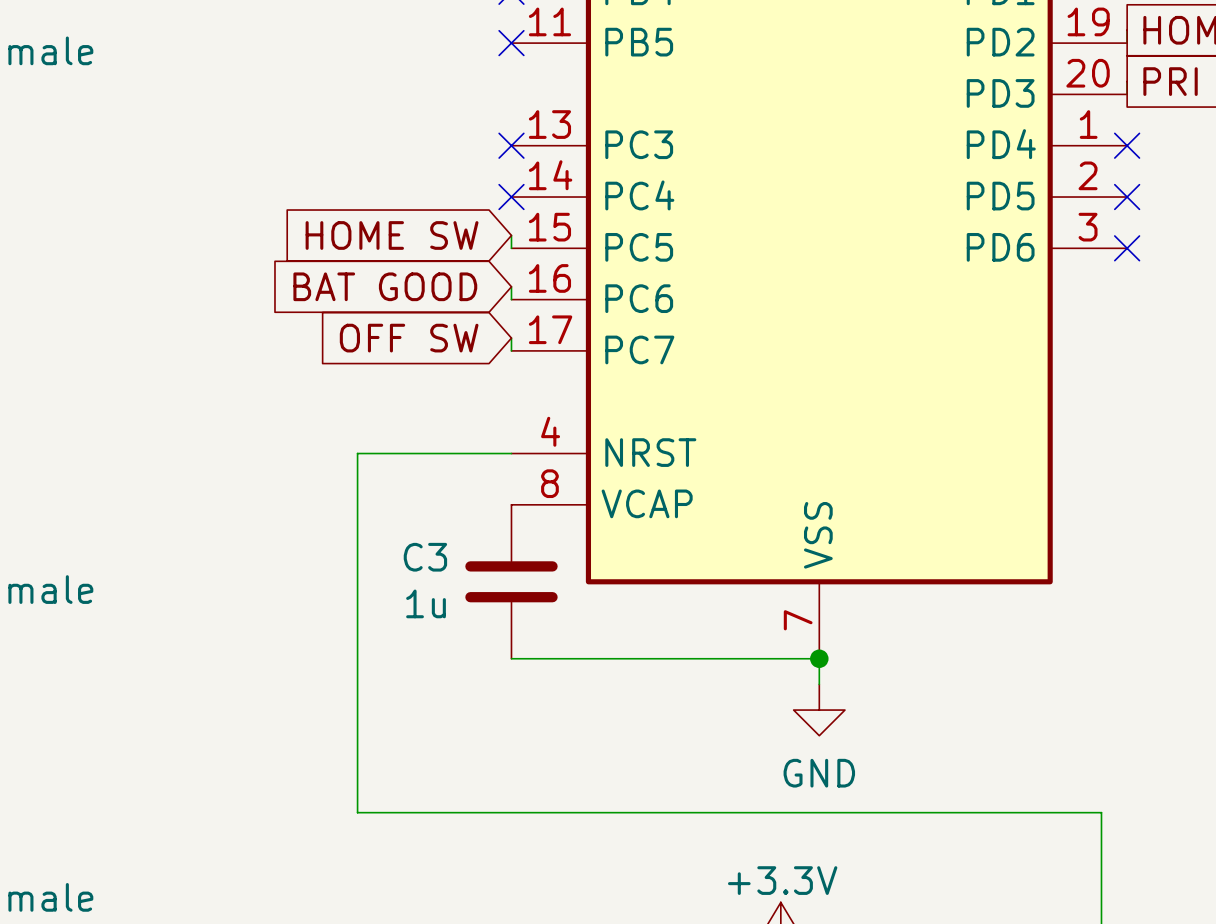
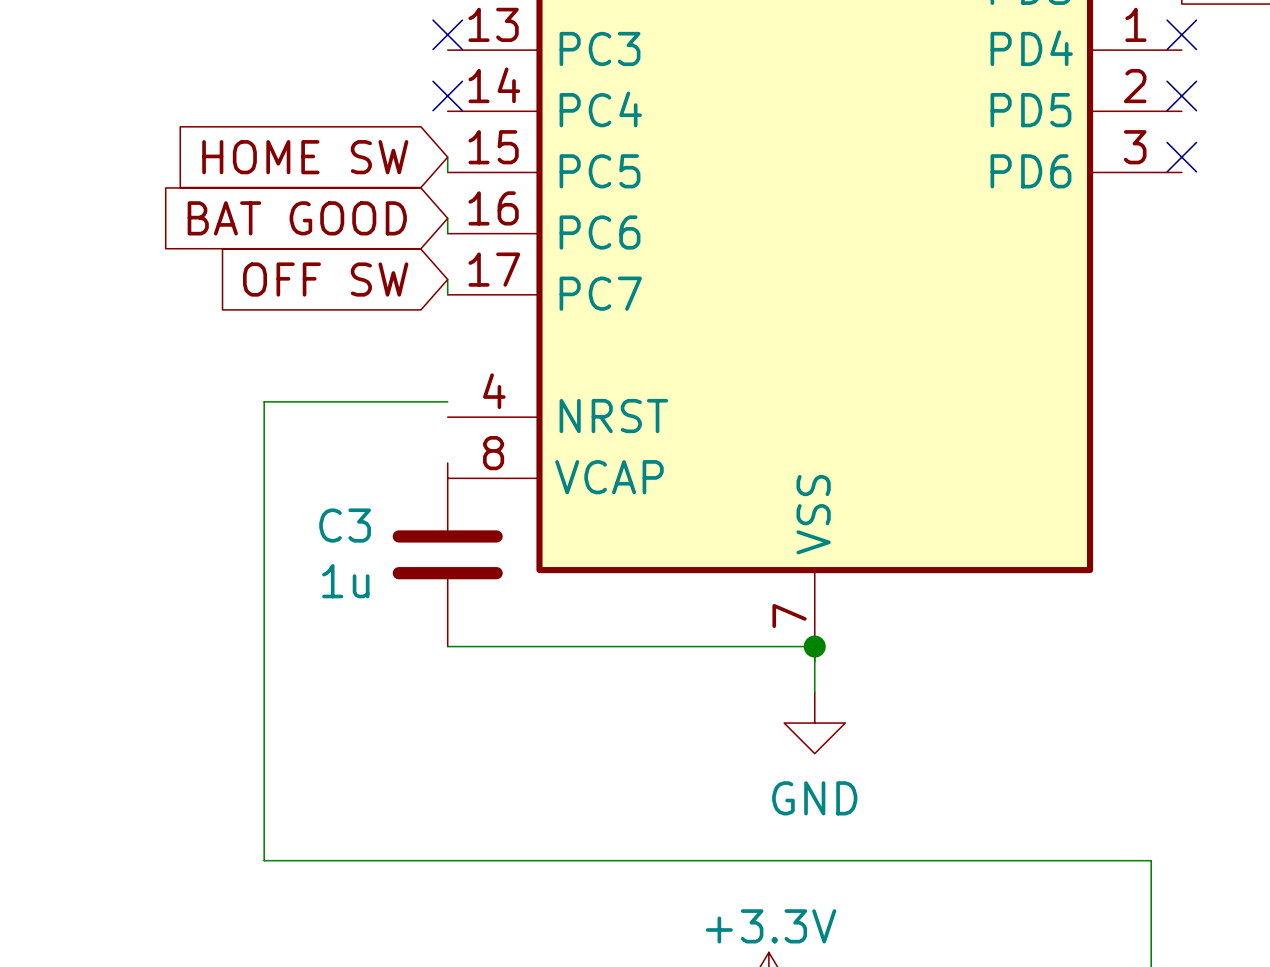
no-connect mark position: (511, 145) -> (447, 34)
no-connect mark position: (1127, 145) -> (1181, 34)
no-connect mark position: (511, 197) -> (447, 96)
no-connect mark position: (1127, 197) -> (1181, 96)
no-connect mark position: (1127, 248) -> (1181, 157)
wire: (357, 453) (511, 453) -> (264, 417) (264, 401) (447, 401)
C3 position: (511, 581) -> (447, 554)
wire: (511, 658) (819, 658) -> (447, 646) (814, 646) (814, 661)
junction position: (819, 658) -> (814, 646)
wire: (357, 812) (1101, 812) (1101, 825) -> (264, 845) (264, 860) (1151, 860)

